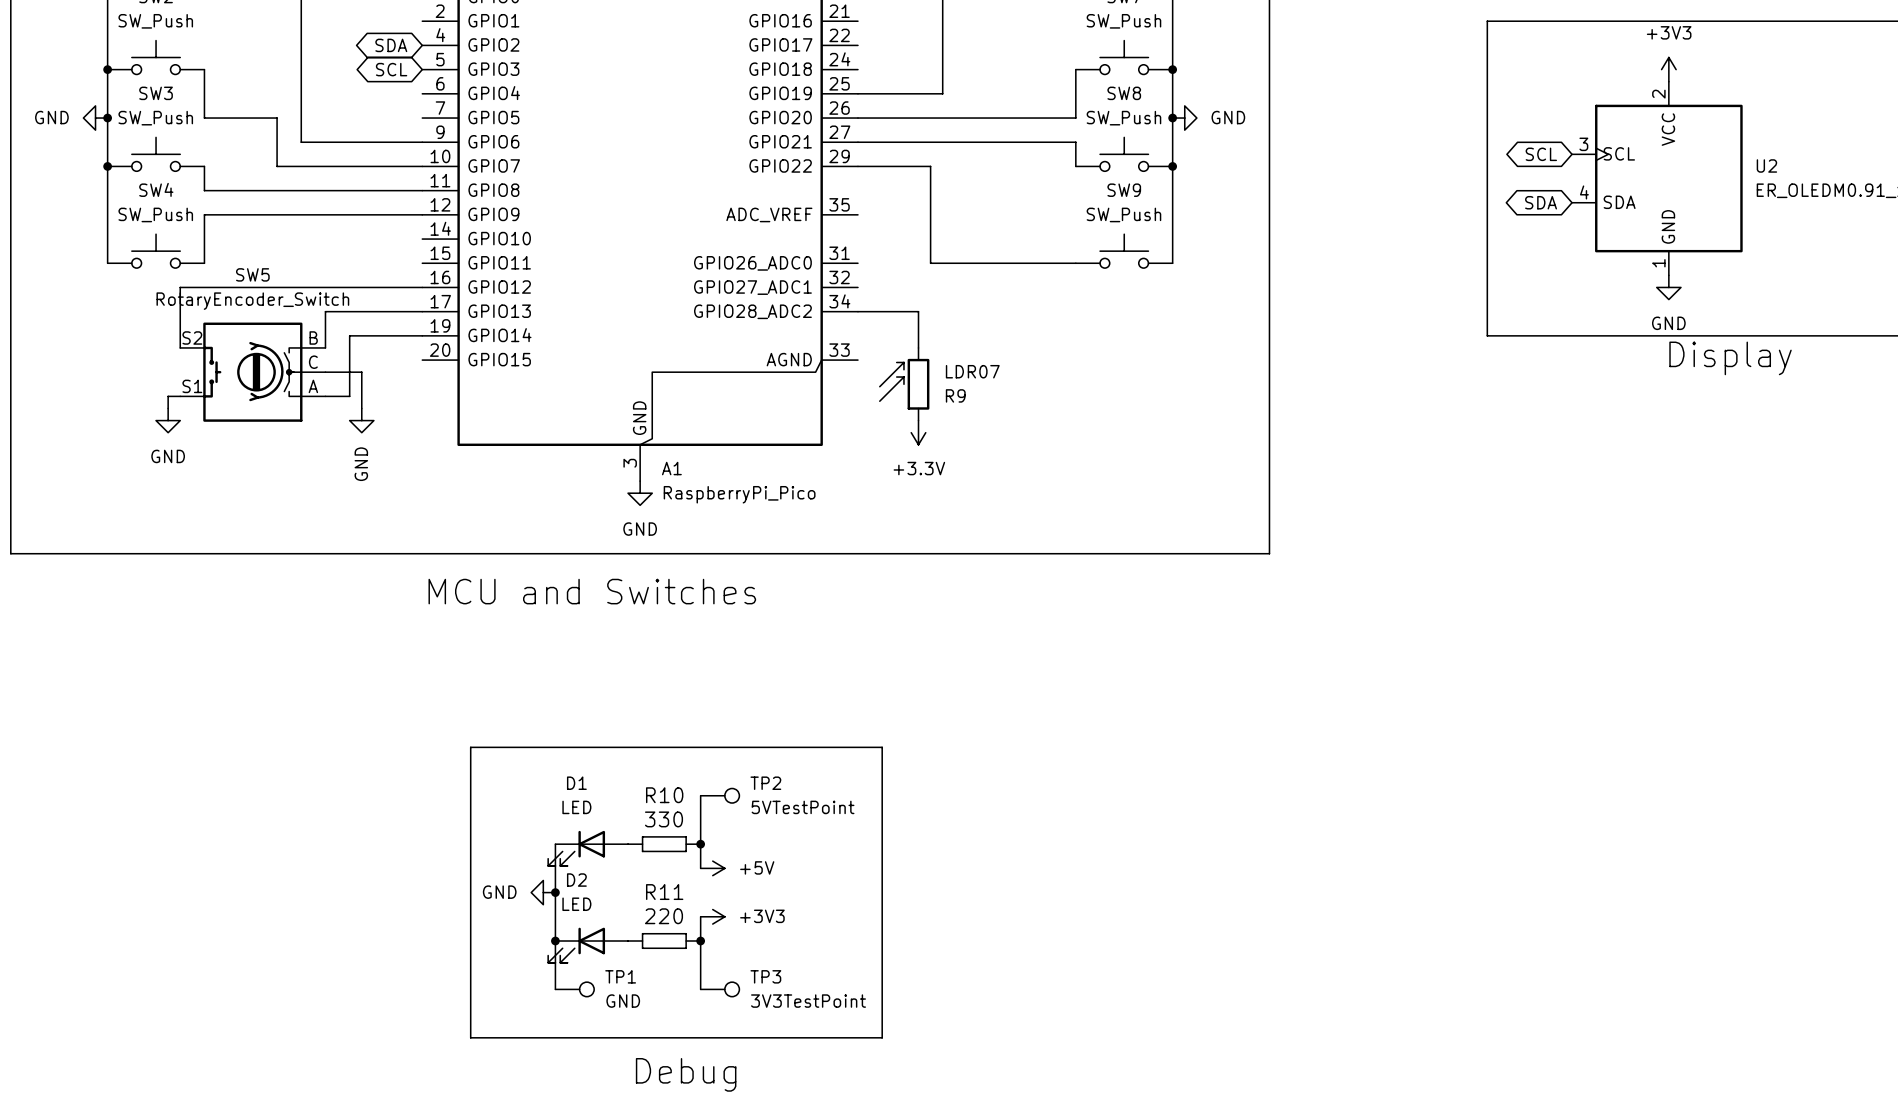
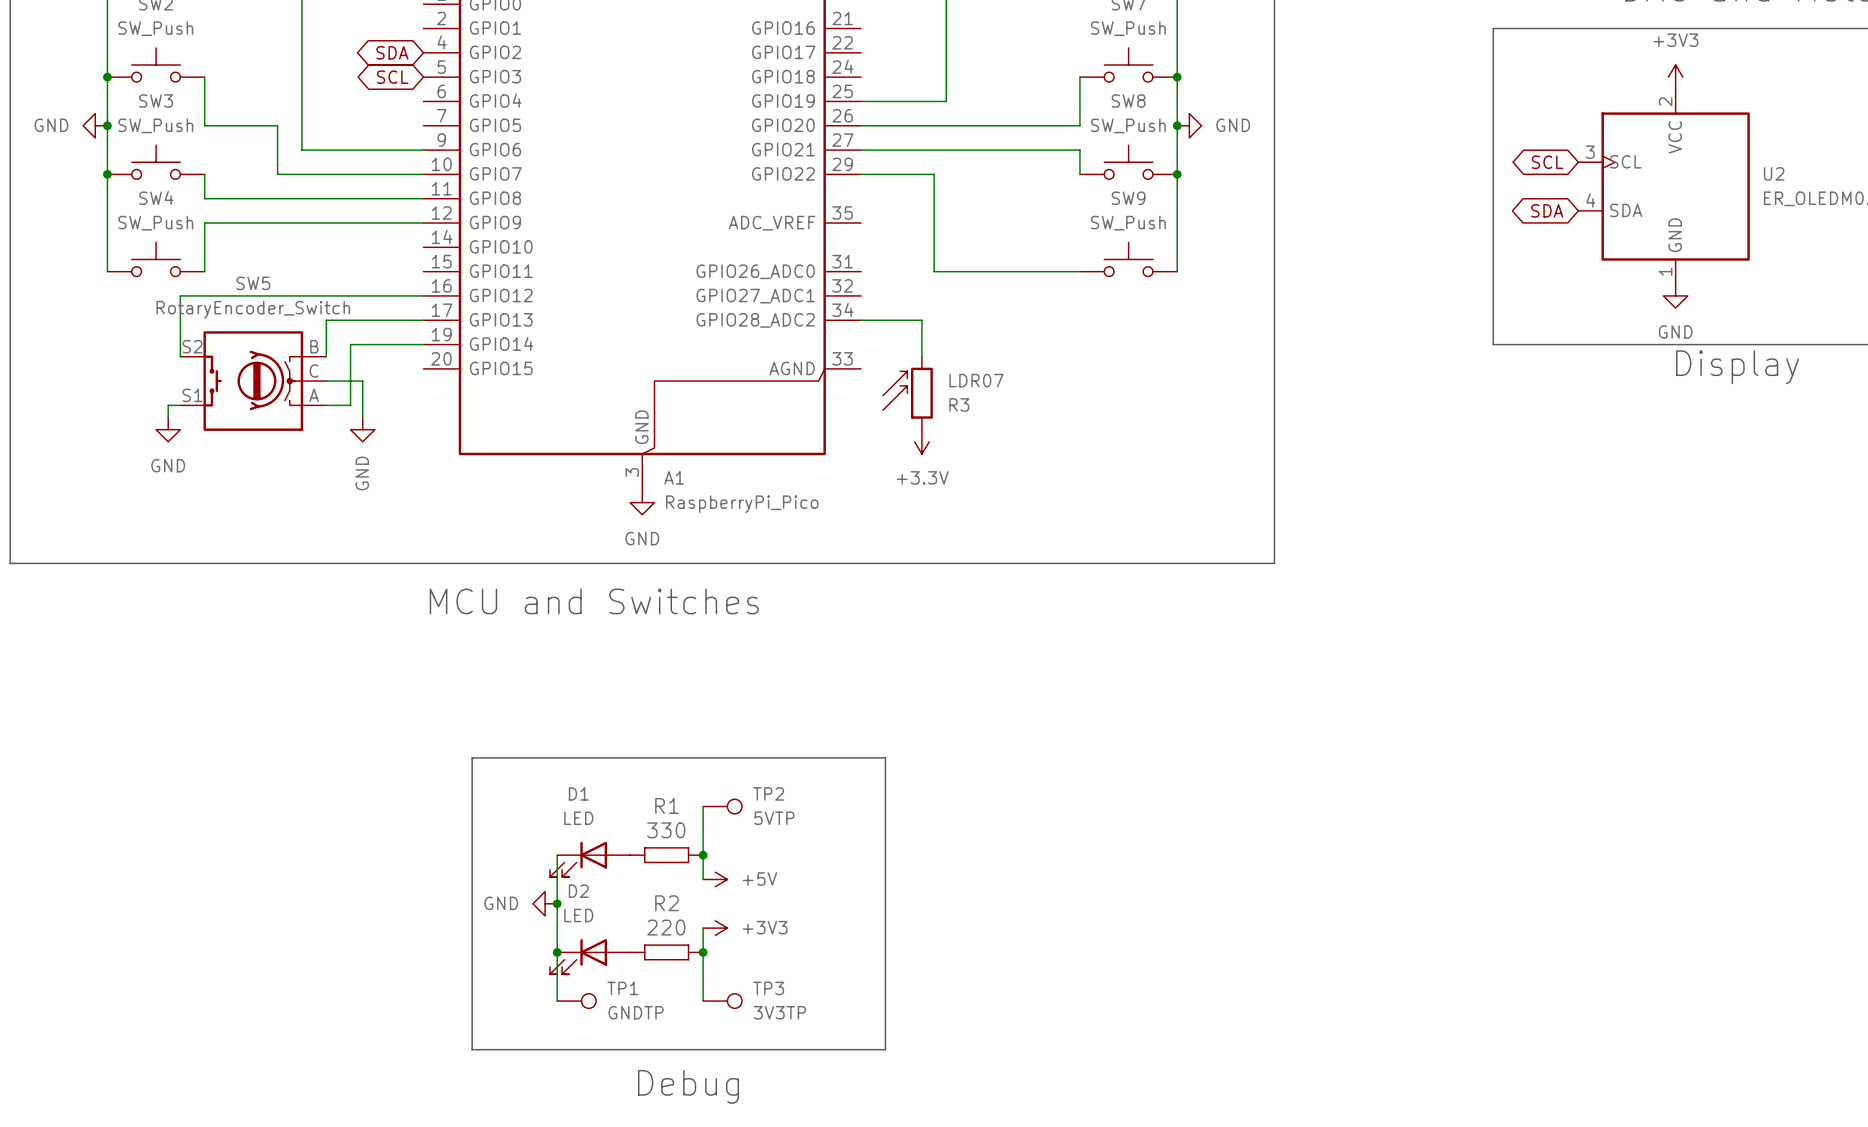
R9 name: R9 (955, 395) -> R3 (959, 404)
R10 name: R10 (664, 795) -> R1 (666, 805)
TP2 value: 5VTestPoint (803, 807) -> 5VTP (774, 818)
R11 name: R11 (664, 892) -> R2 (666, 903)
TP1 value: GND (623, 1001) -> GNDTP (636, 1012)
TP3 value: 3V3TestPoint (808, 1001) -> 3V3TP (779, 1012)

